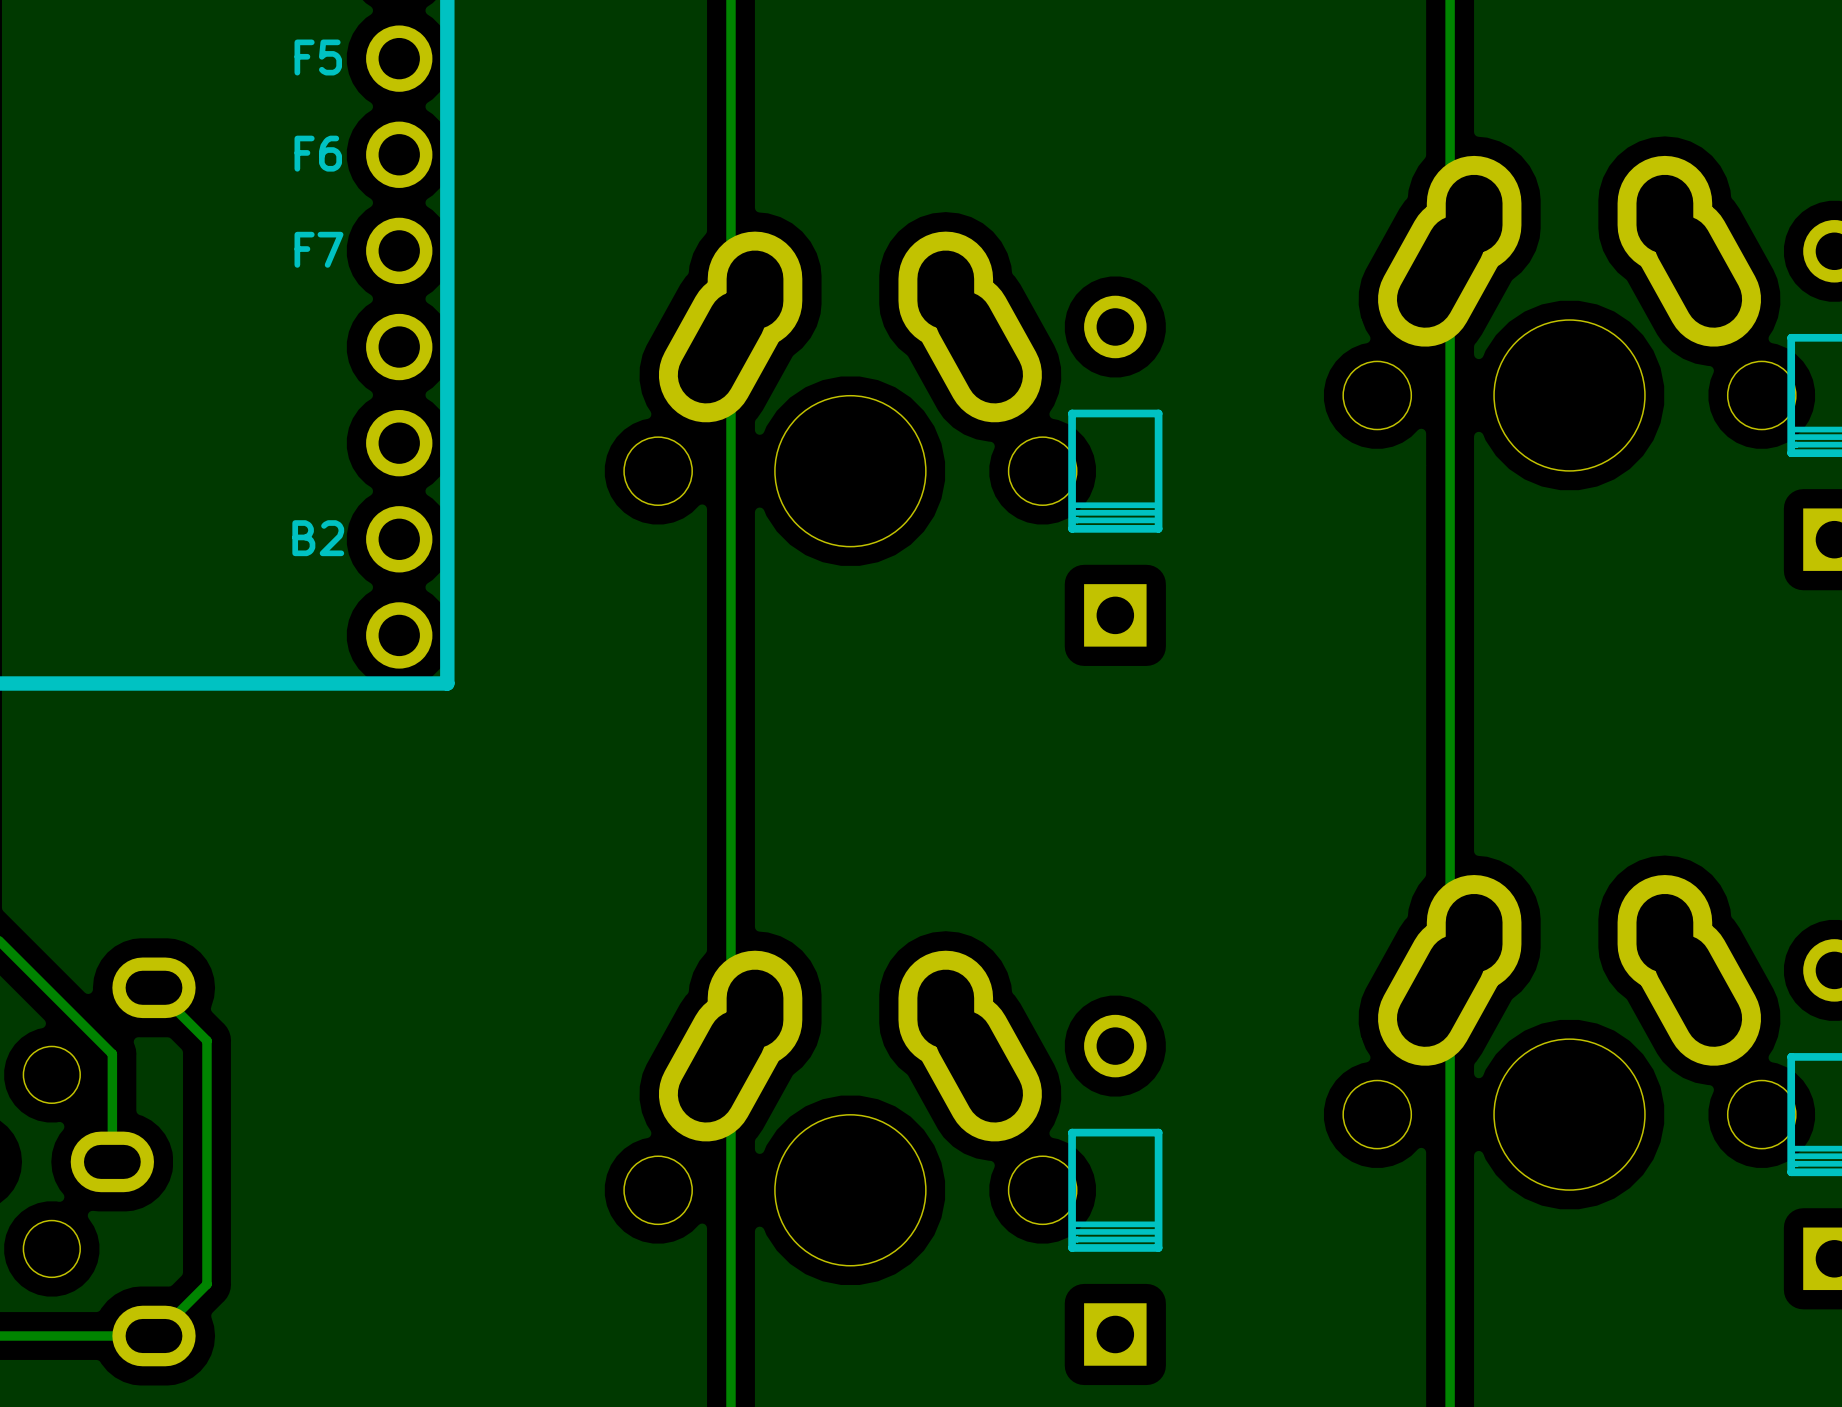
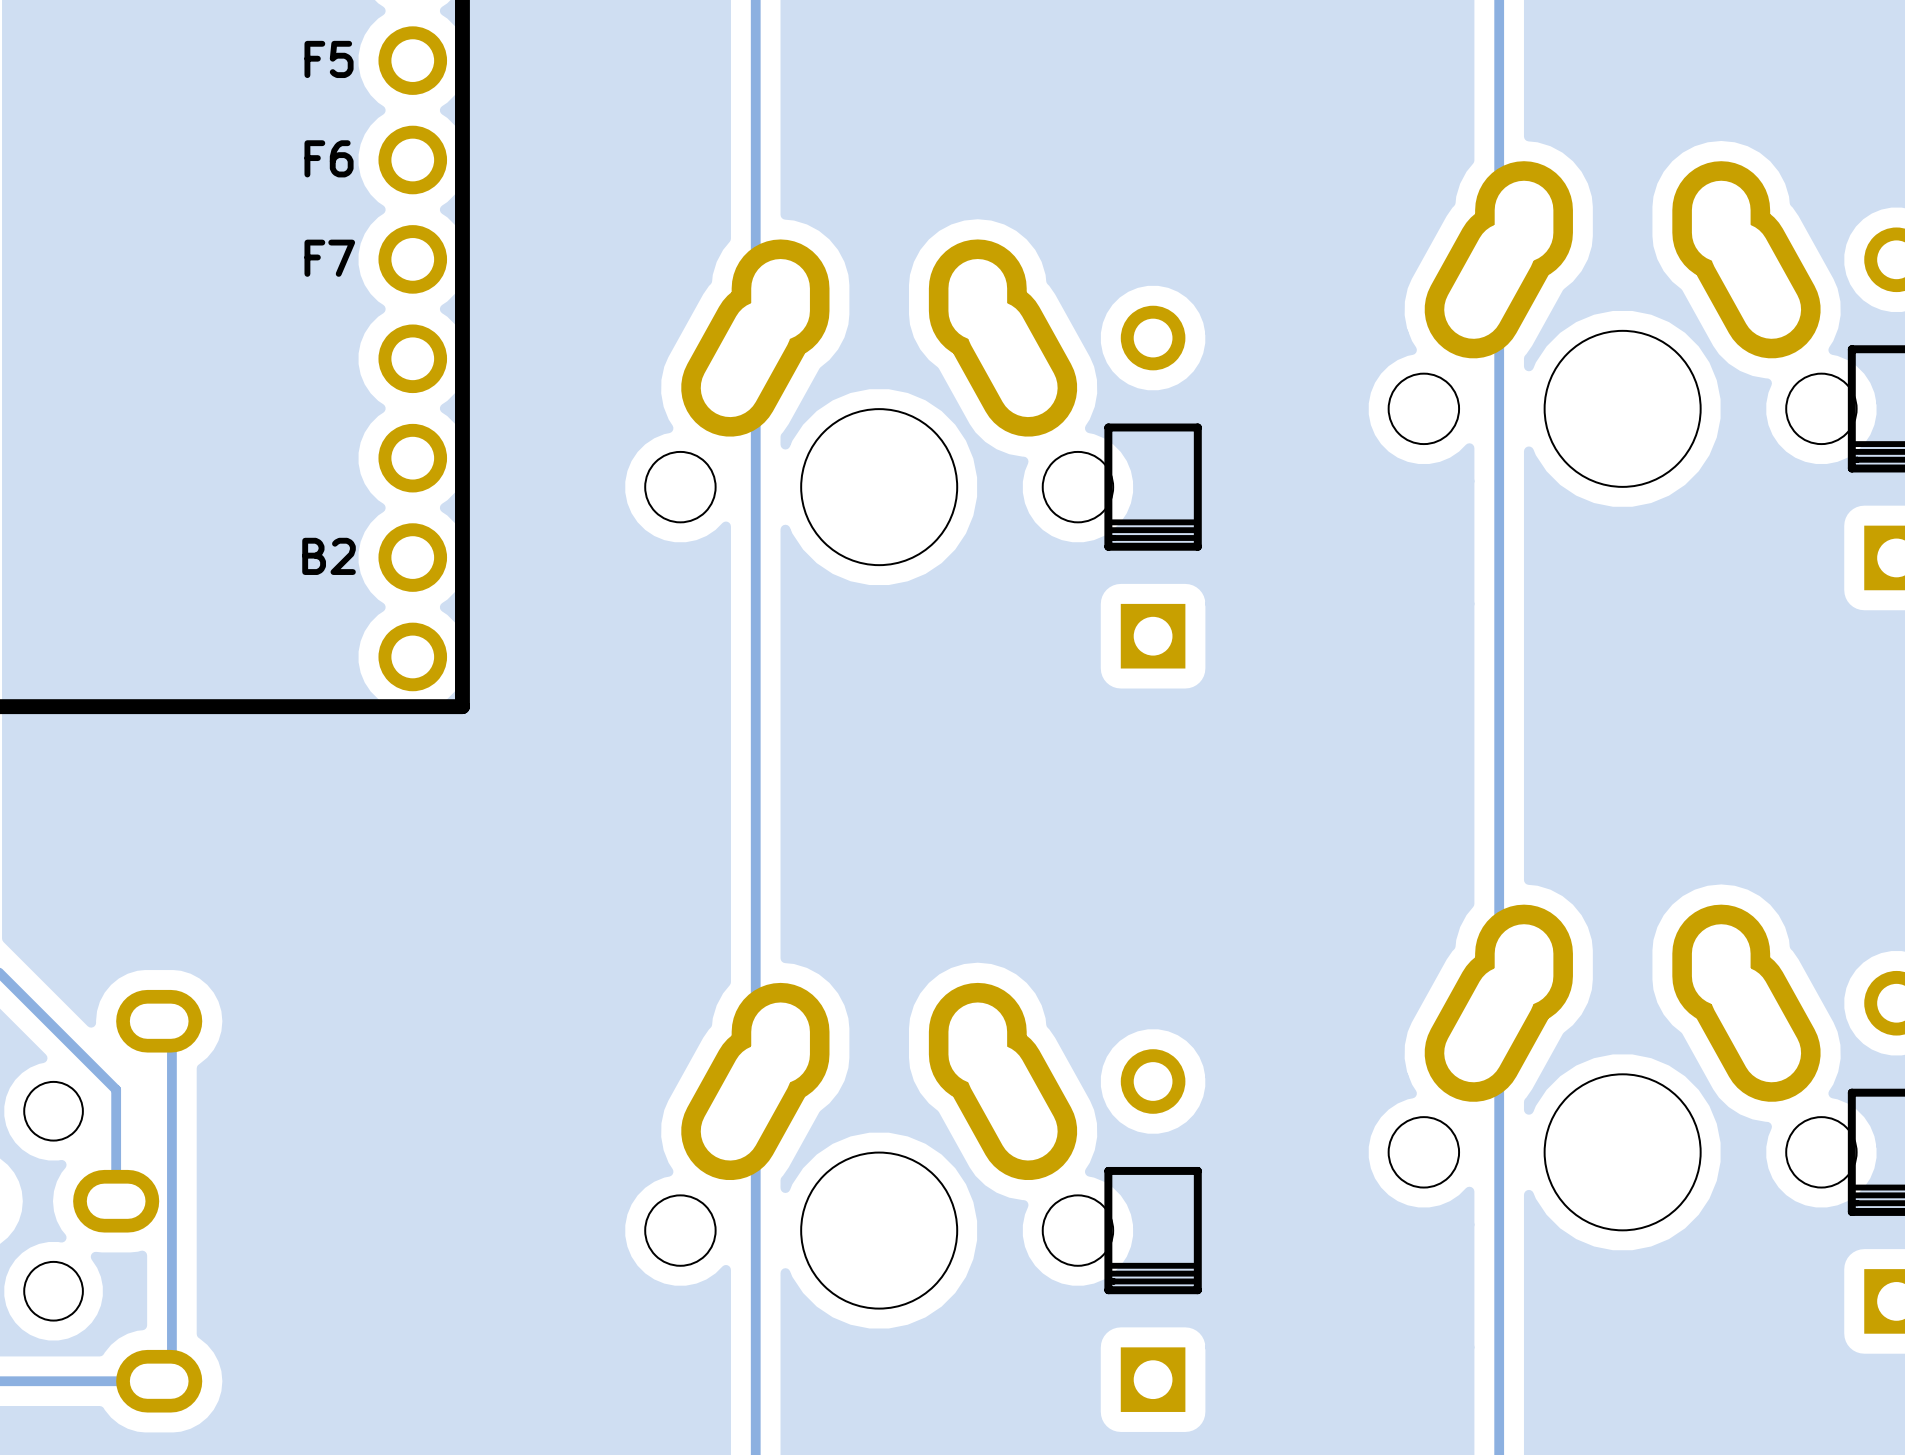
track: (166, 1000) (206, 1040) (206, 1284) (166, 1325) -> (171, 1033) (171, 1369)

